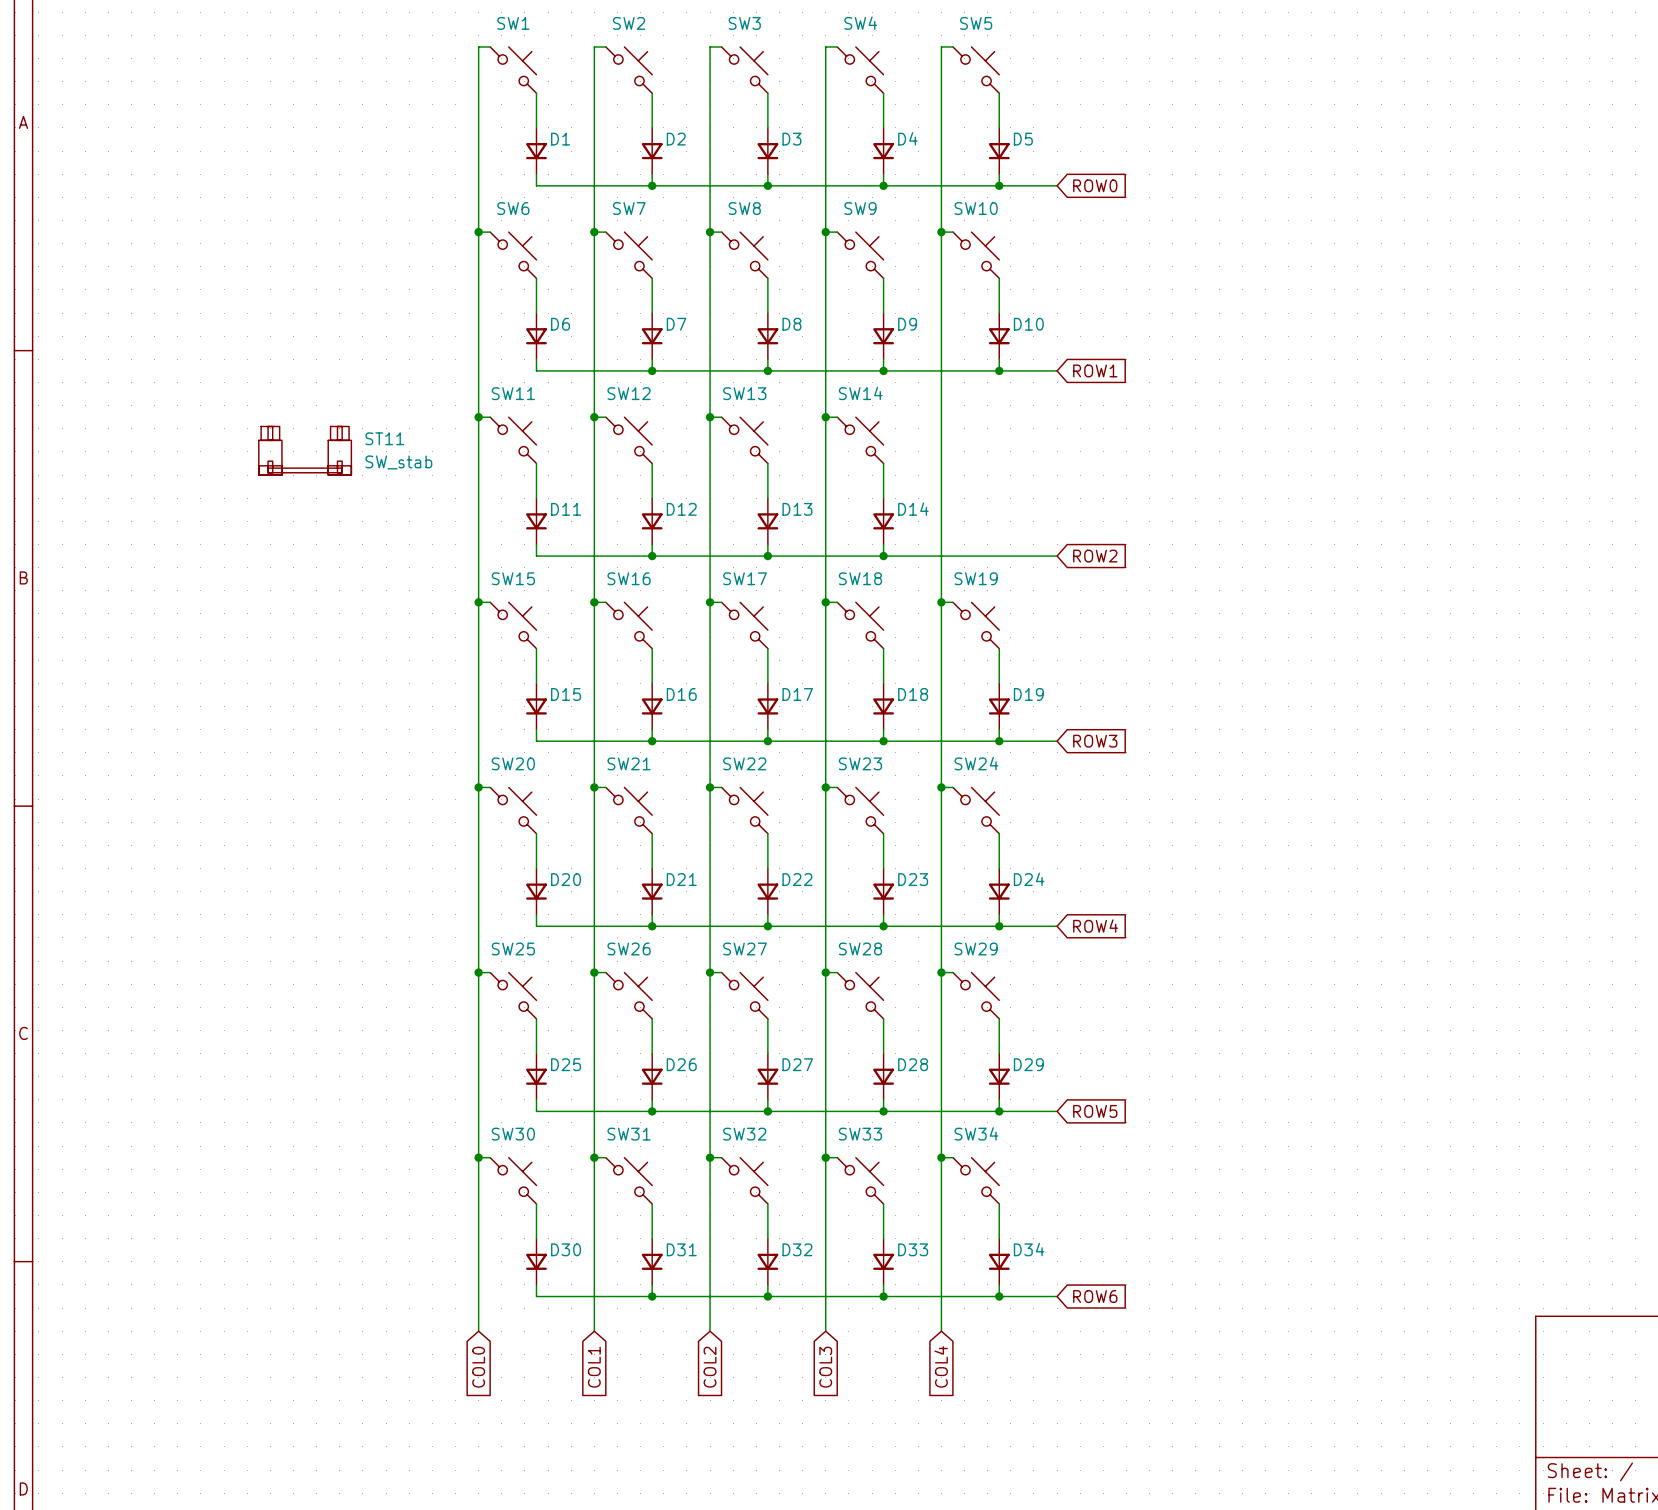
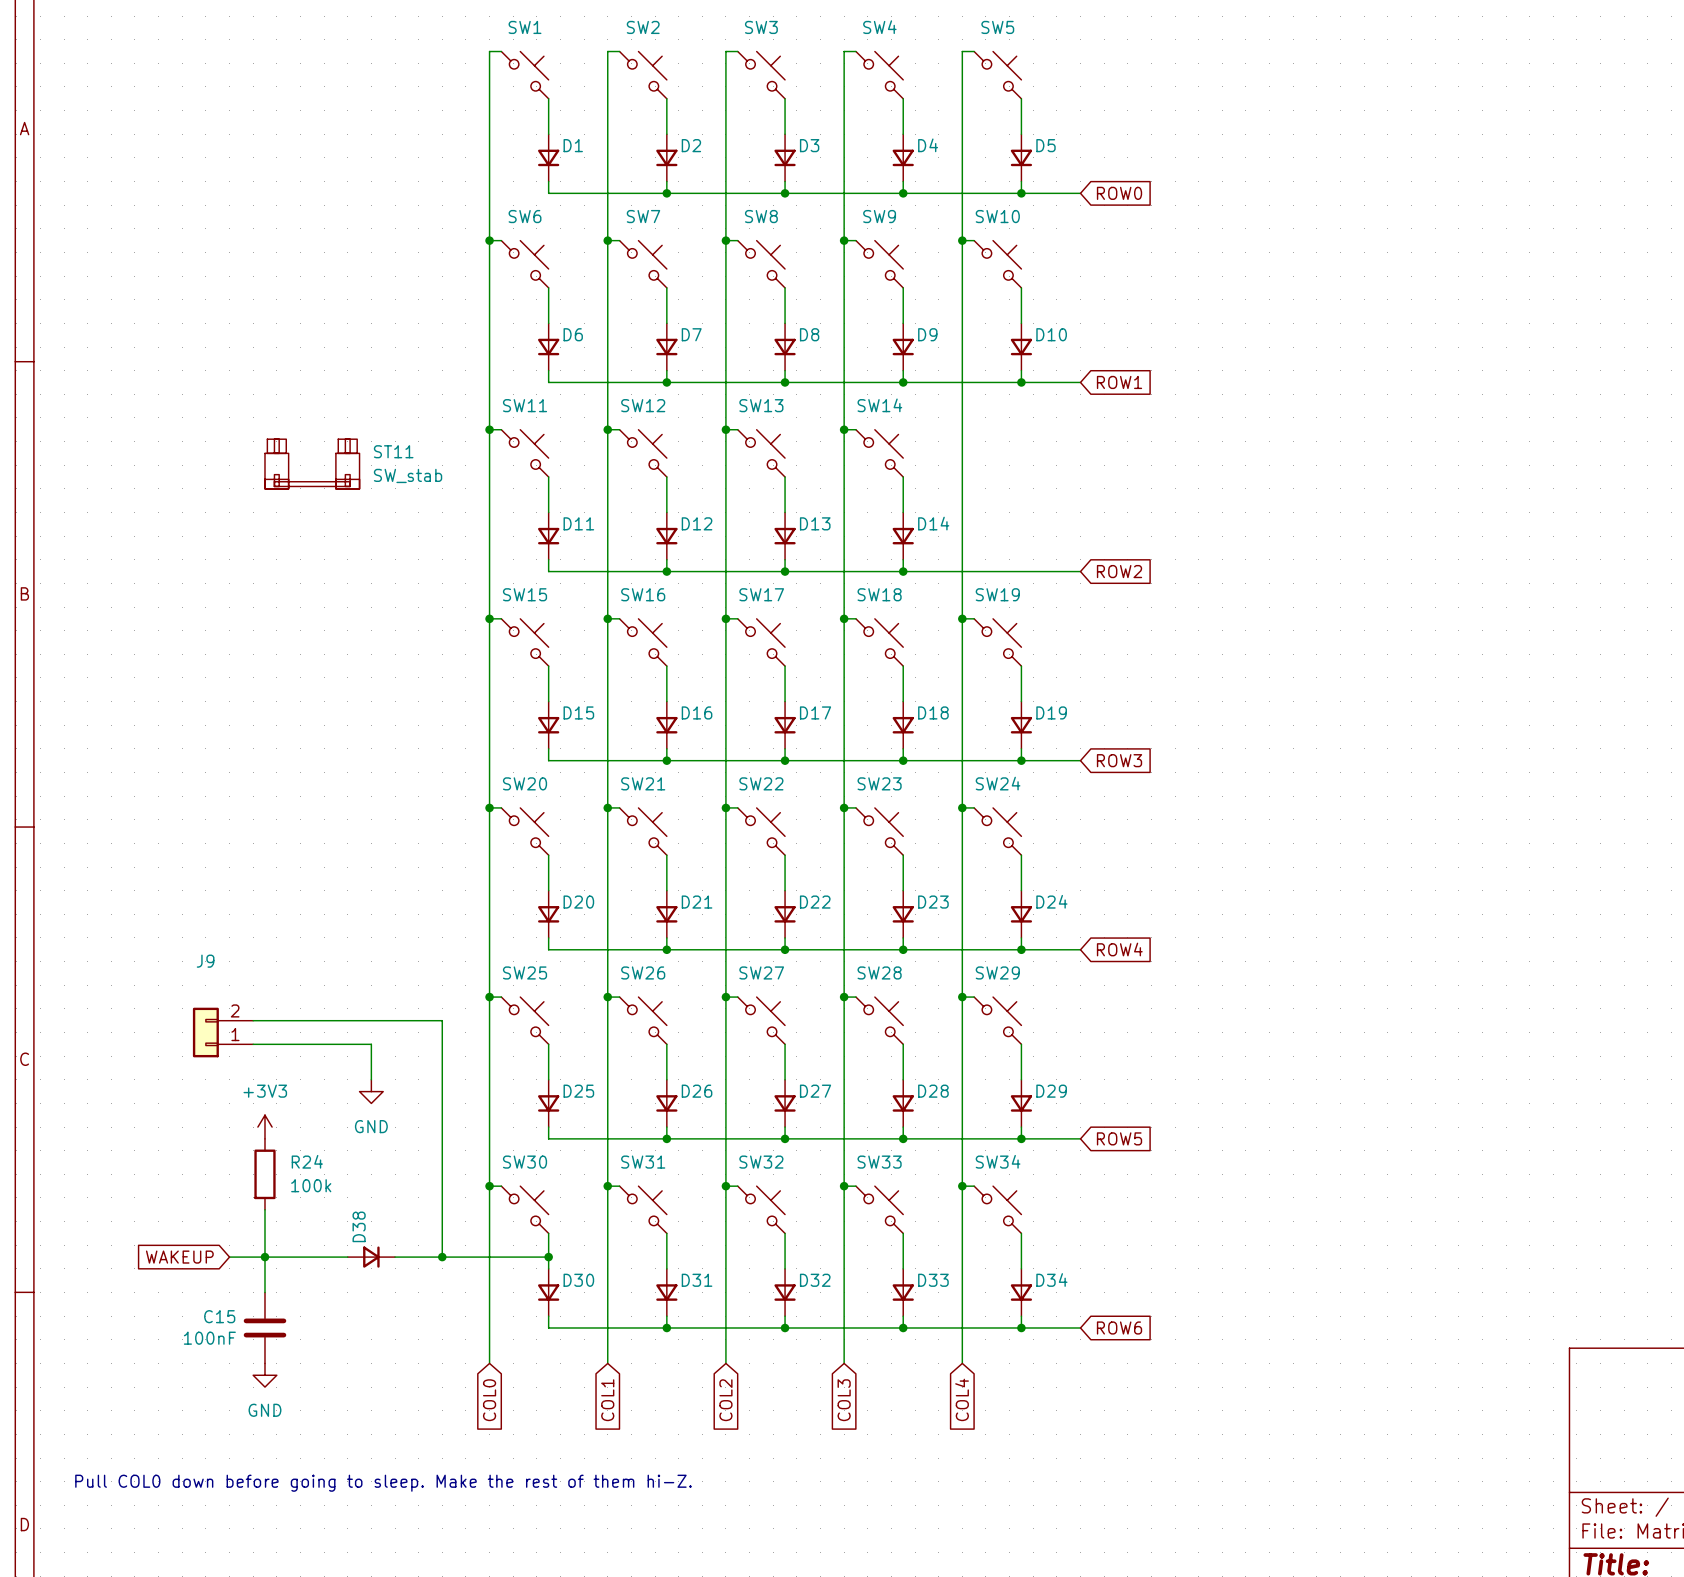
wire: none -> (253, 1020) (442, 1020) (442, 1257)
J9: none -> (223, 1032)
wire: none -> (253, 1044) (371, 1044) (371, 1079)
power symbol: none -> GND (371, 1091)
power symbol: none -> +3V3 (264, 1127)
R24: none -> 100k (264, 1174)
wire: none -> (264, 1209) (264, 1292)
global label: none -> WAKEUP (179, 1257)
wire: none -> (229, 1257) (347, 1257)
junction: none -> (264, 1257)
D38: none -> (371, 1257)
wire: none -> (395, 1257) (548, 1257)
junction: none -> (442, 1257)
junction: none -> (548, 1257)
C15: none -> 100nF (264, 1327)
power symbol: none -> GND (264, 1375)
text: none -> Pull COL0 down before going to sleep. Make the rest of them hi-Z. (383, 1483)

